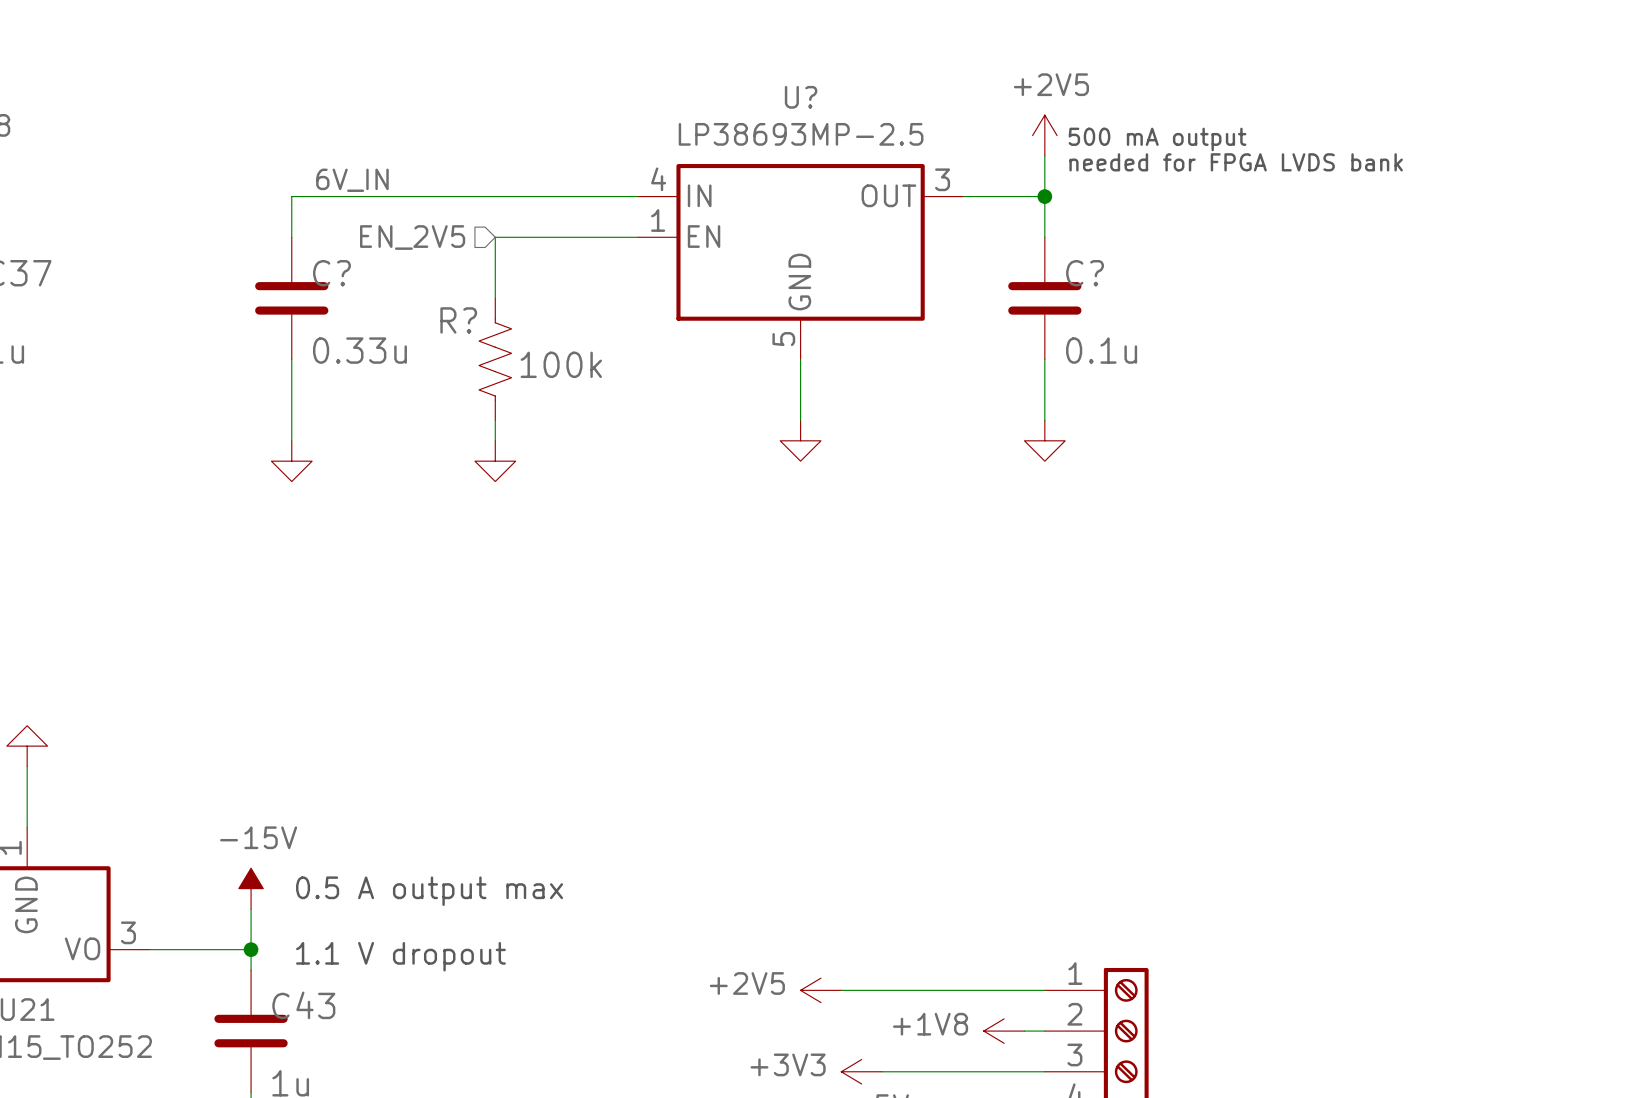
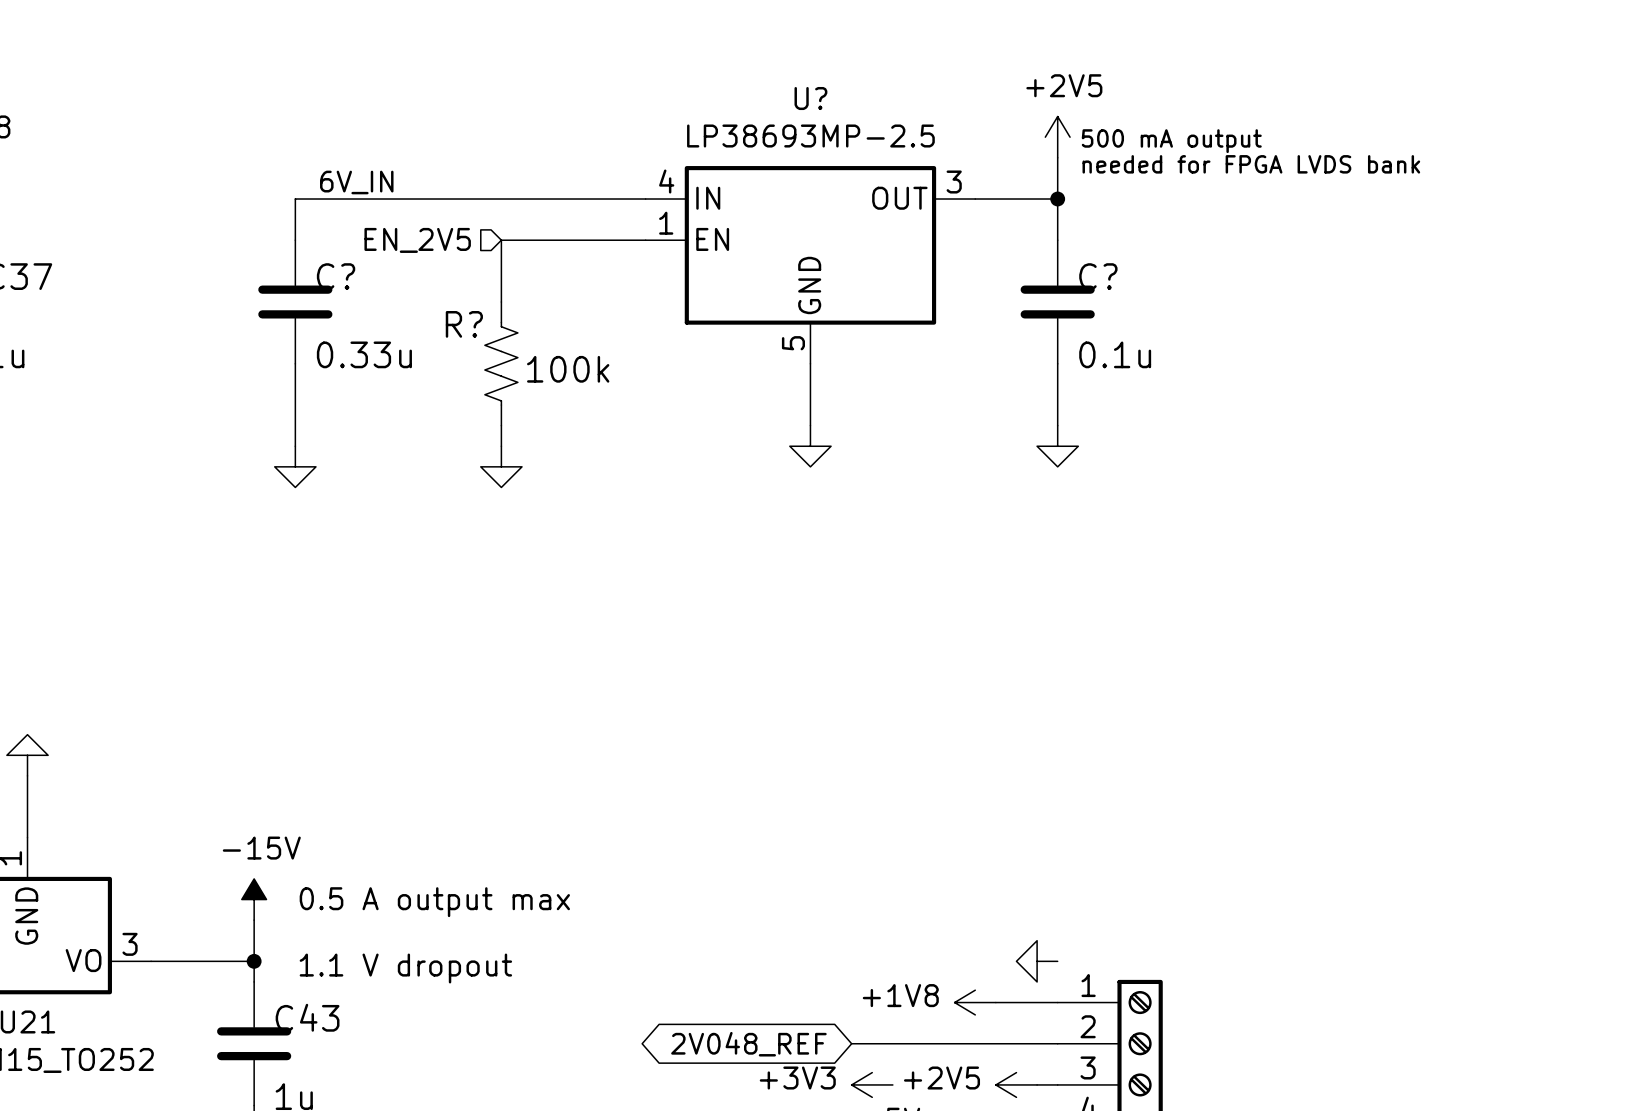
power symbol: none -> (1037, 961)
power symbol position: +2V5 (820, 990) -> +2V5 (1016, 1084)
wire: (841, 990) (983, 990) -> none
global label: none -> 2V048_REF (748, 1044)
wire: none -> (851, 1043) (1037, 1043)
power symbol position: +1V8 (1004, 1031) -> +1V8 (975, 1002)
wire: (882, 1071) (1024, 1071) -> none

